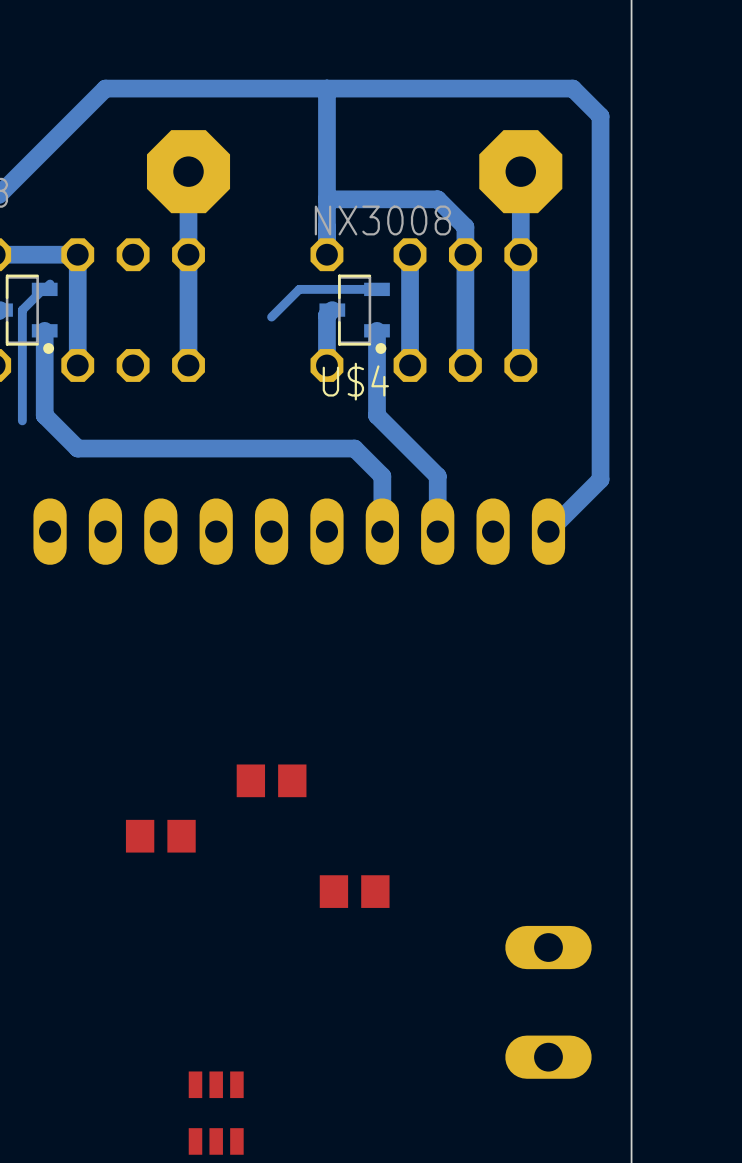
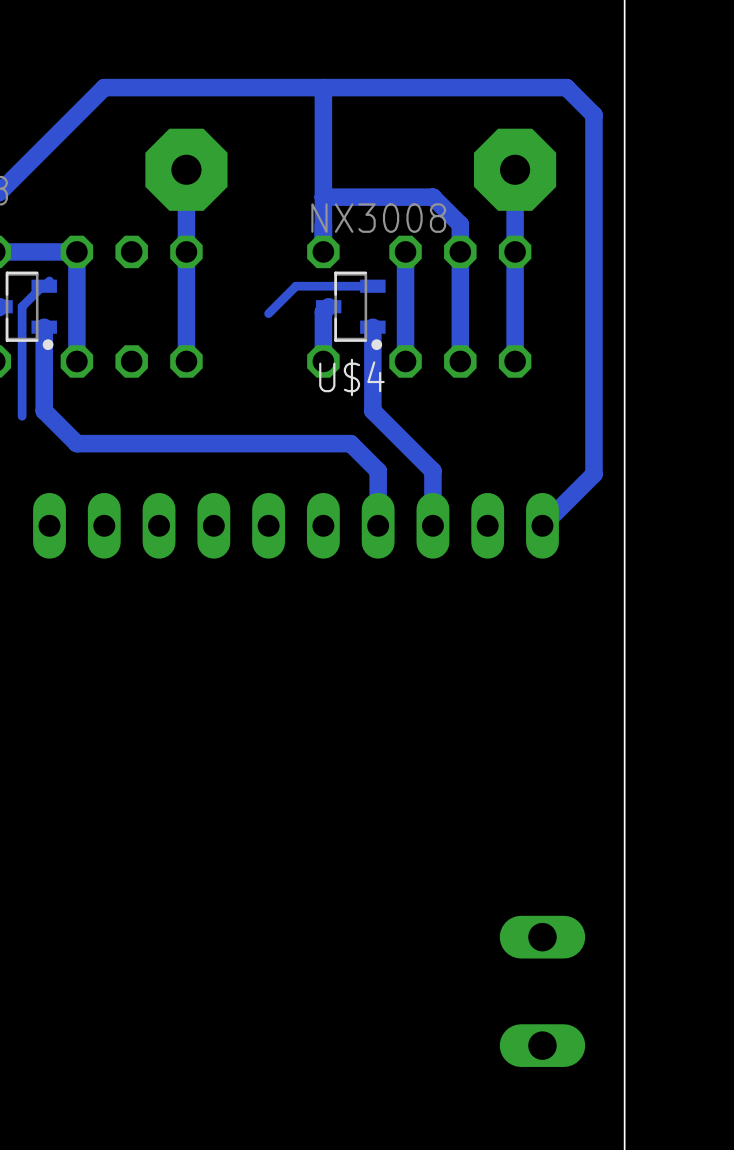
part: (271, 780) -> none
part: (160, 836) -> none
part: (354, 891) -> none
part: (216, 1113) -> none

